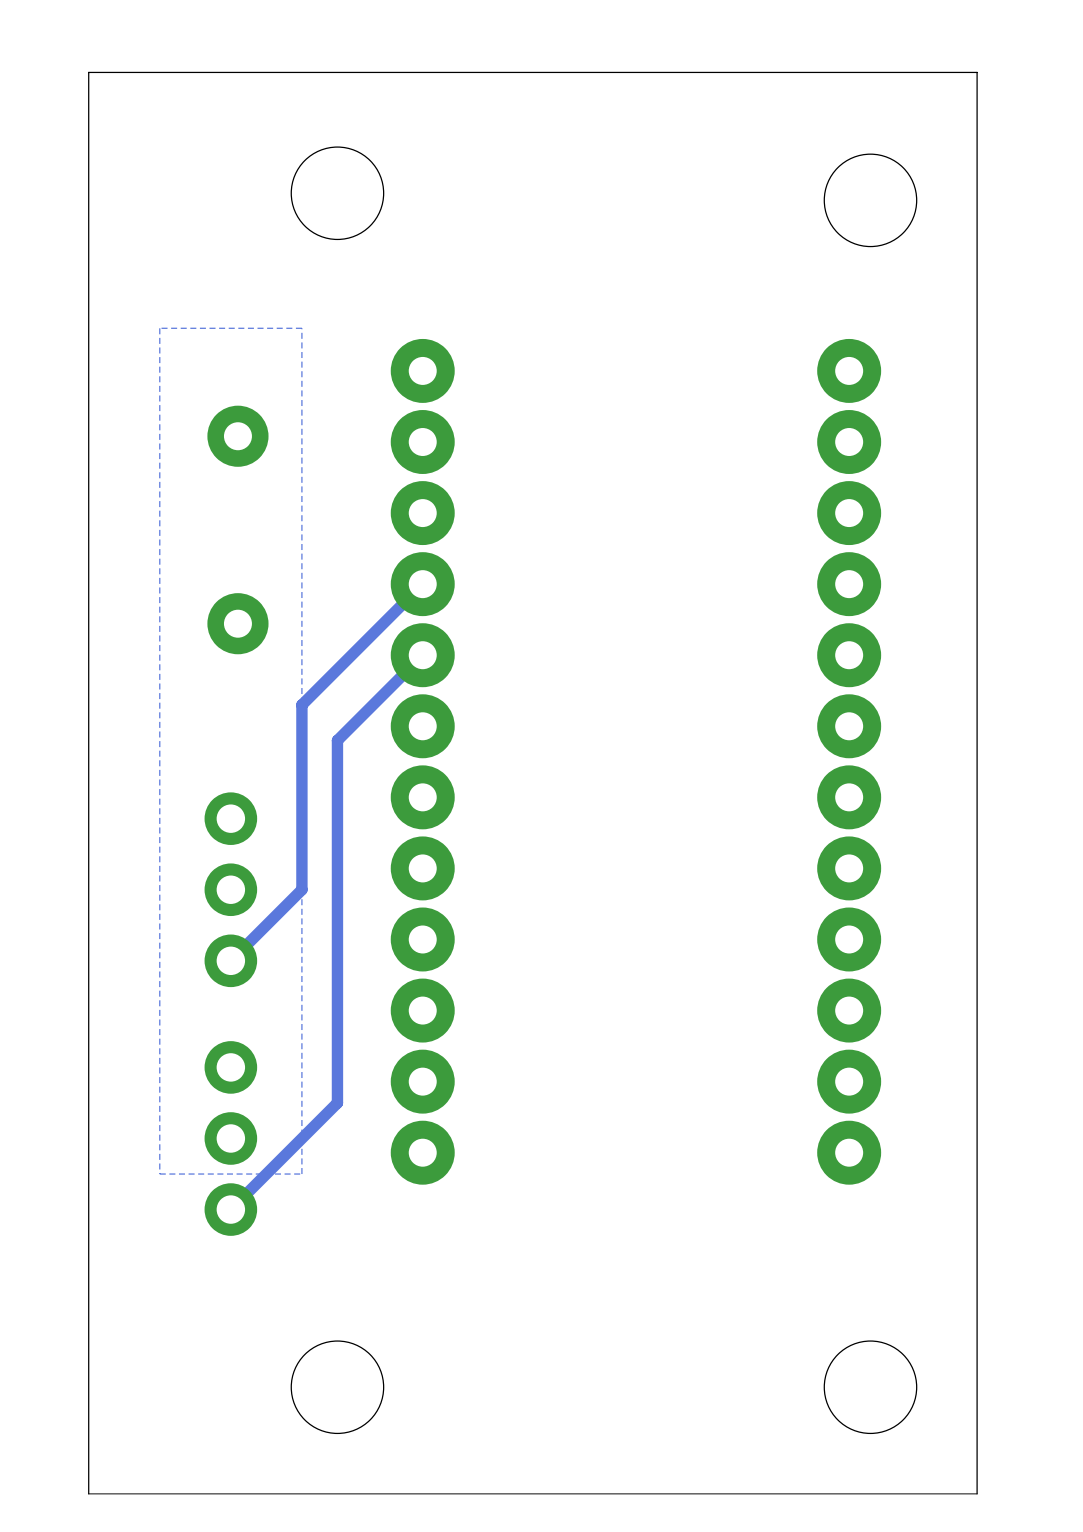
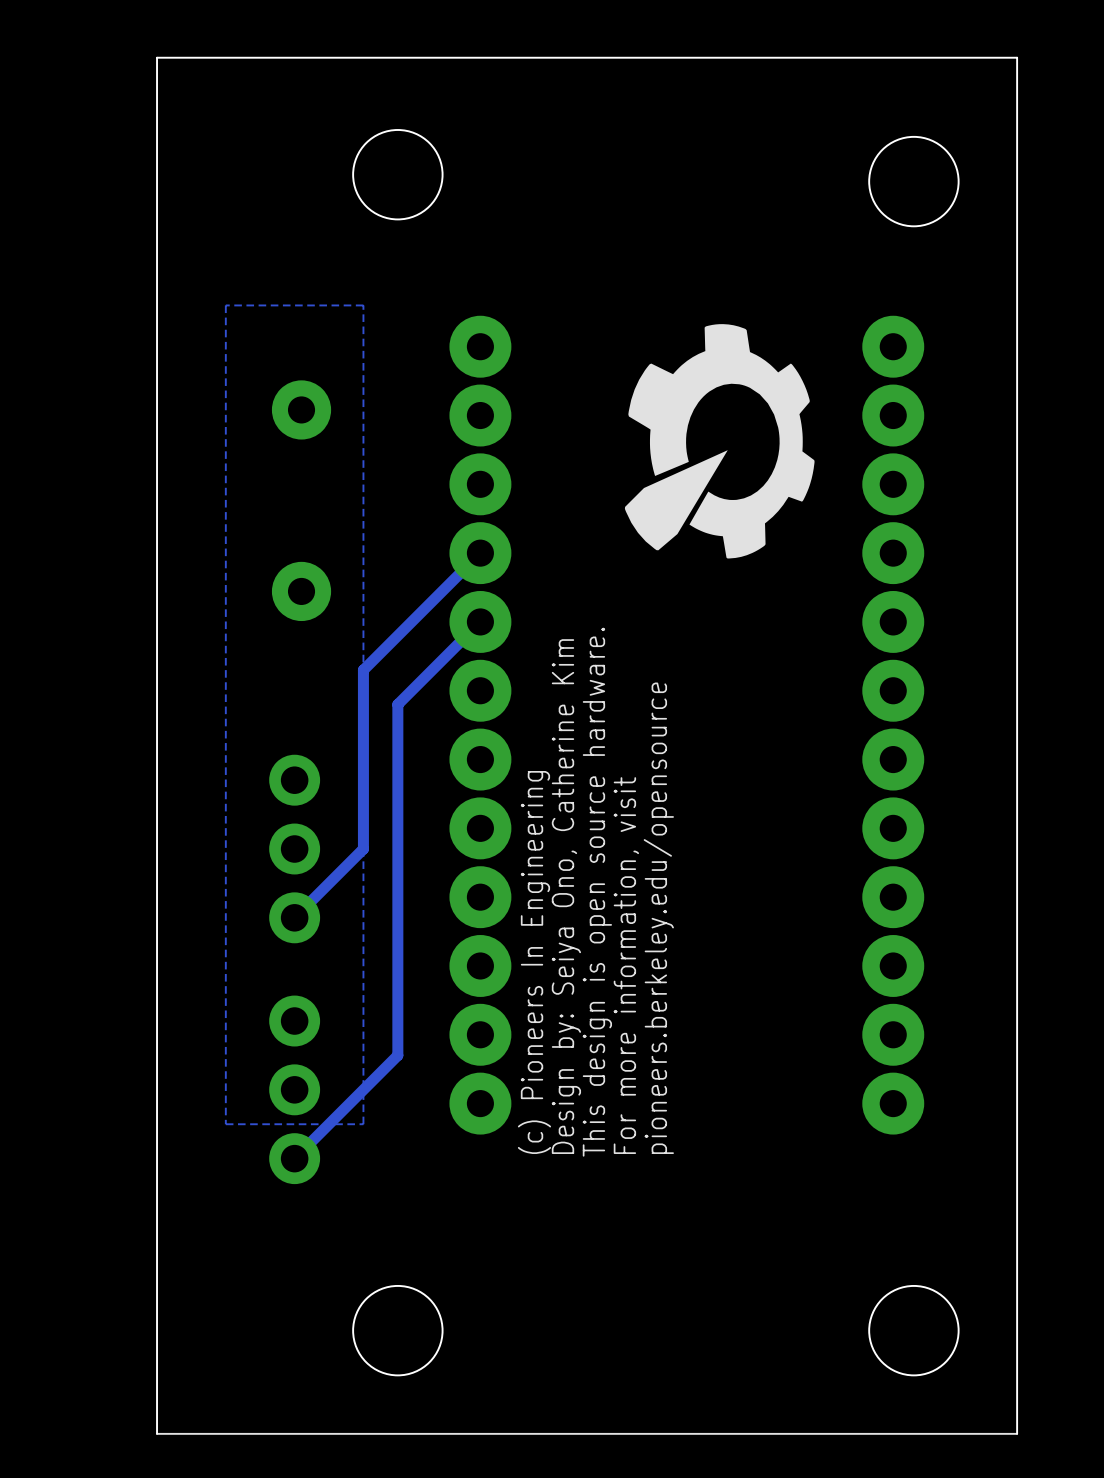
drawing: none -> [624, 324, 815, 559]
text: none -> This design is open source hardware. (597, 892)
text: none -> Design by: Seiya Ono, Catherine Kim (566, 896)
text: none -> pioneers.berkeley.edu/opensource (658, 918)
text: none -> (c) Pioneers In Engineering (534, 962)
text: none -> For more information, visit (626, 965)

